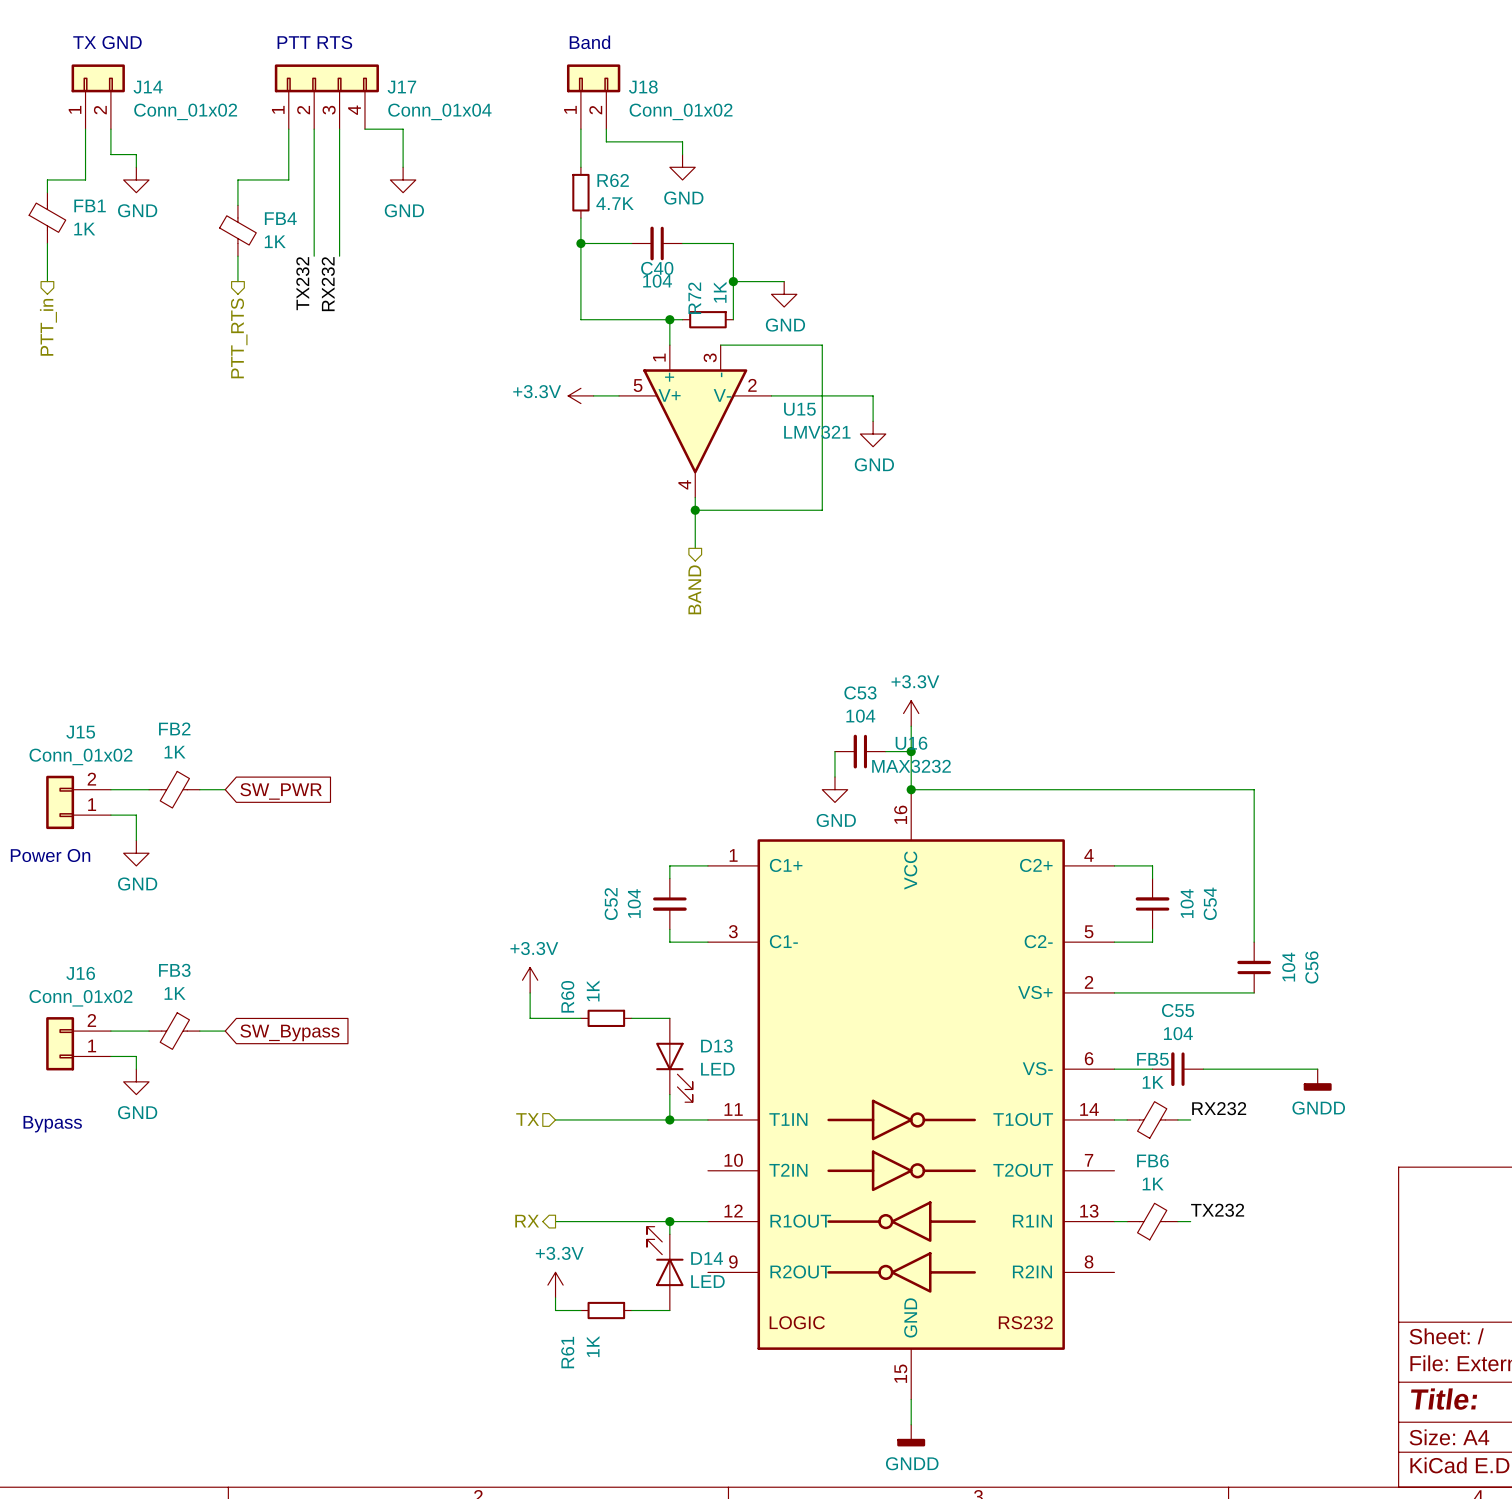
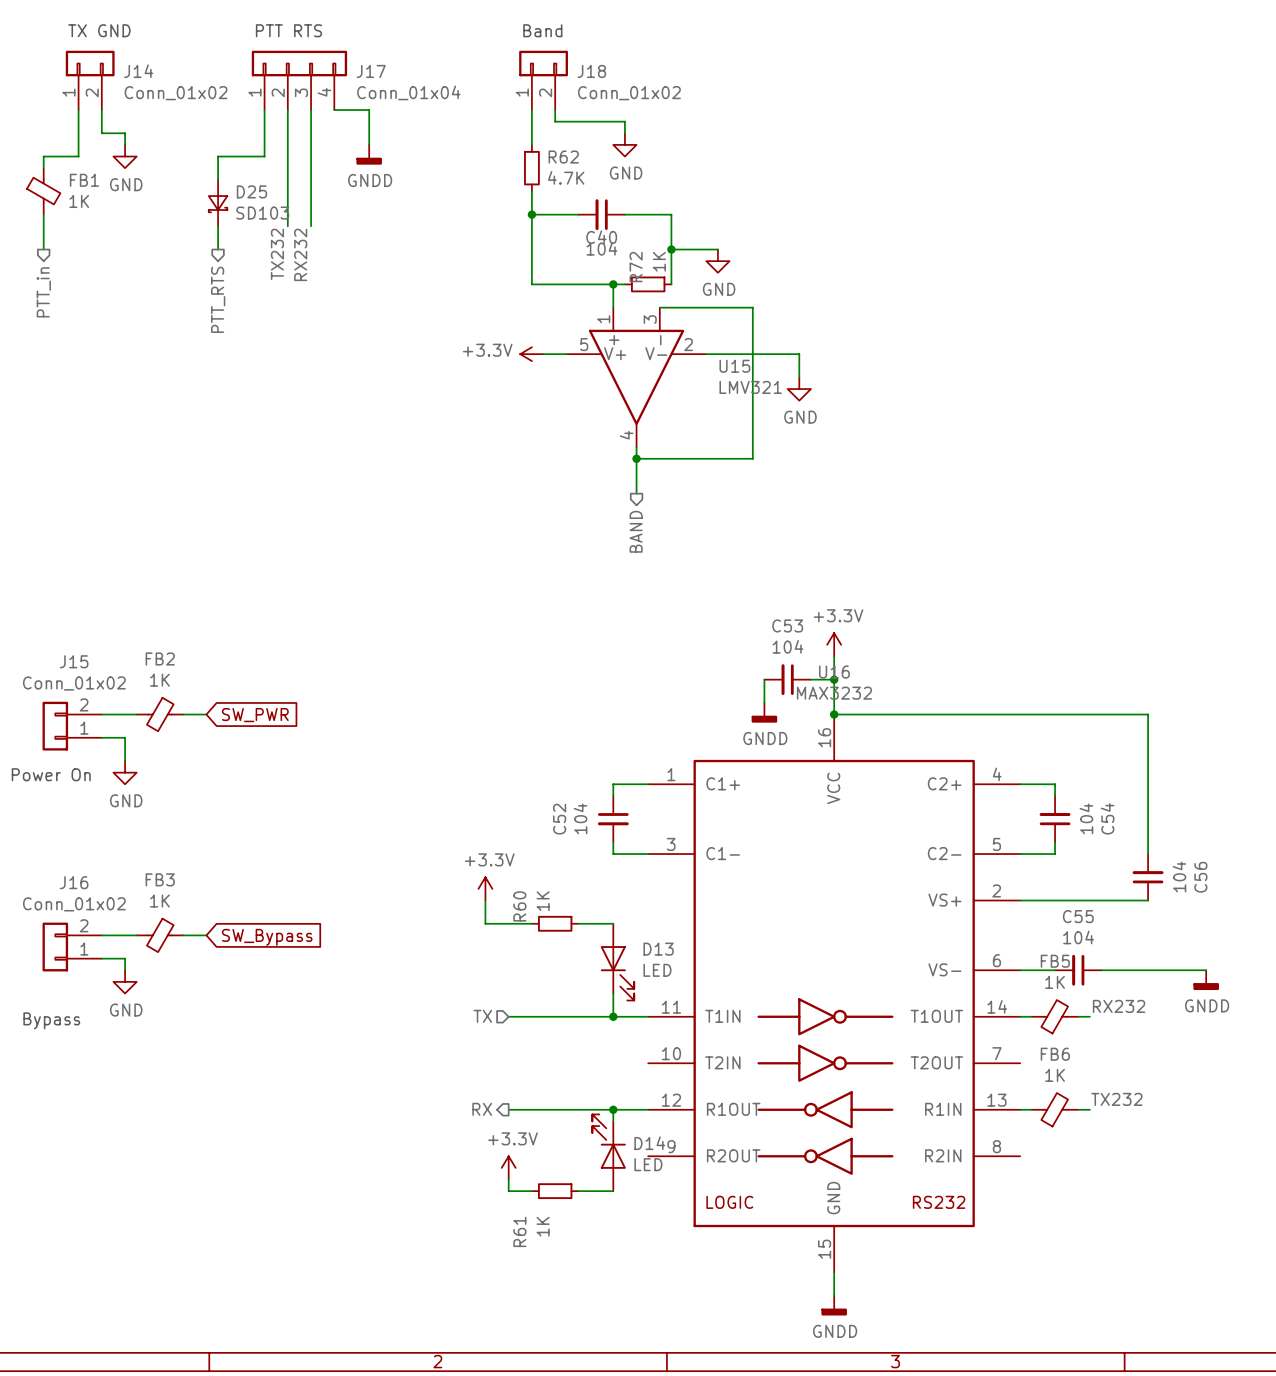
power symbol: GND (403, 179) -> GNDD (369, 154)
FB4: 1K (237, 230) -> none
D25: none -> SD103 (218, 203)
power symbol: GND (834, 789) -> GNDD (764, 712)

